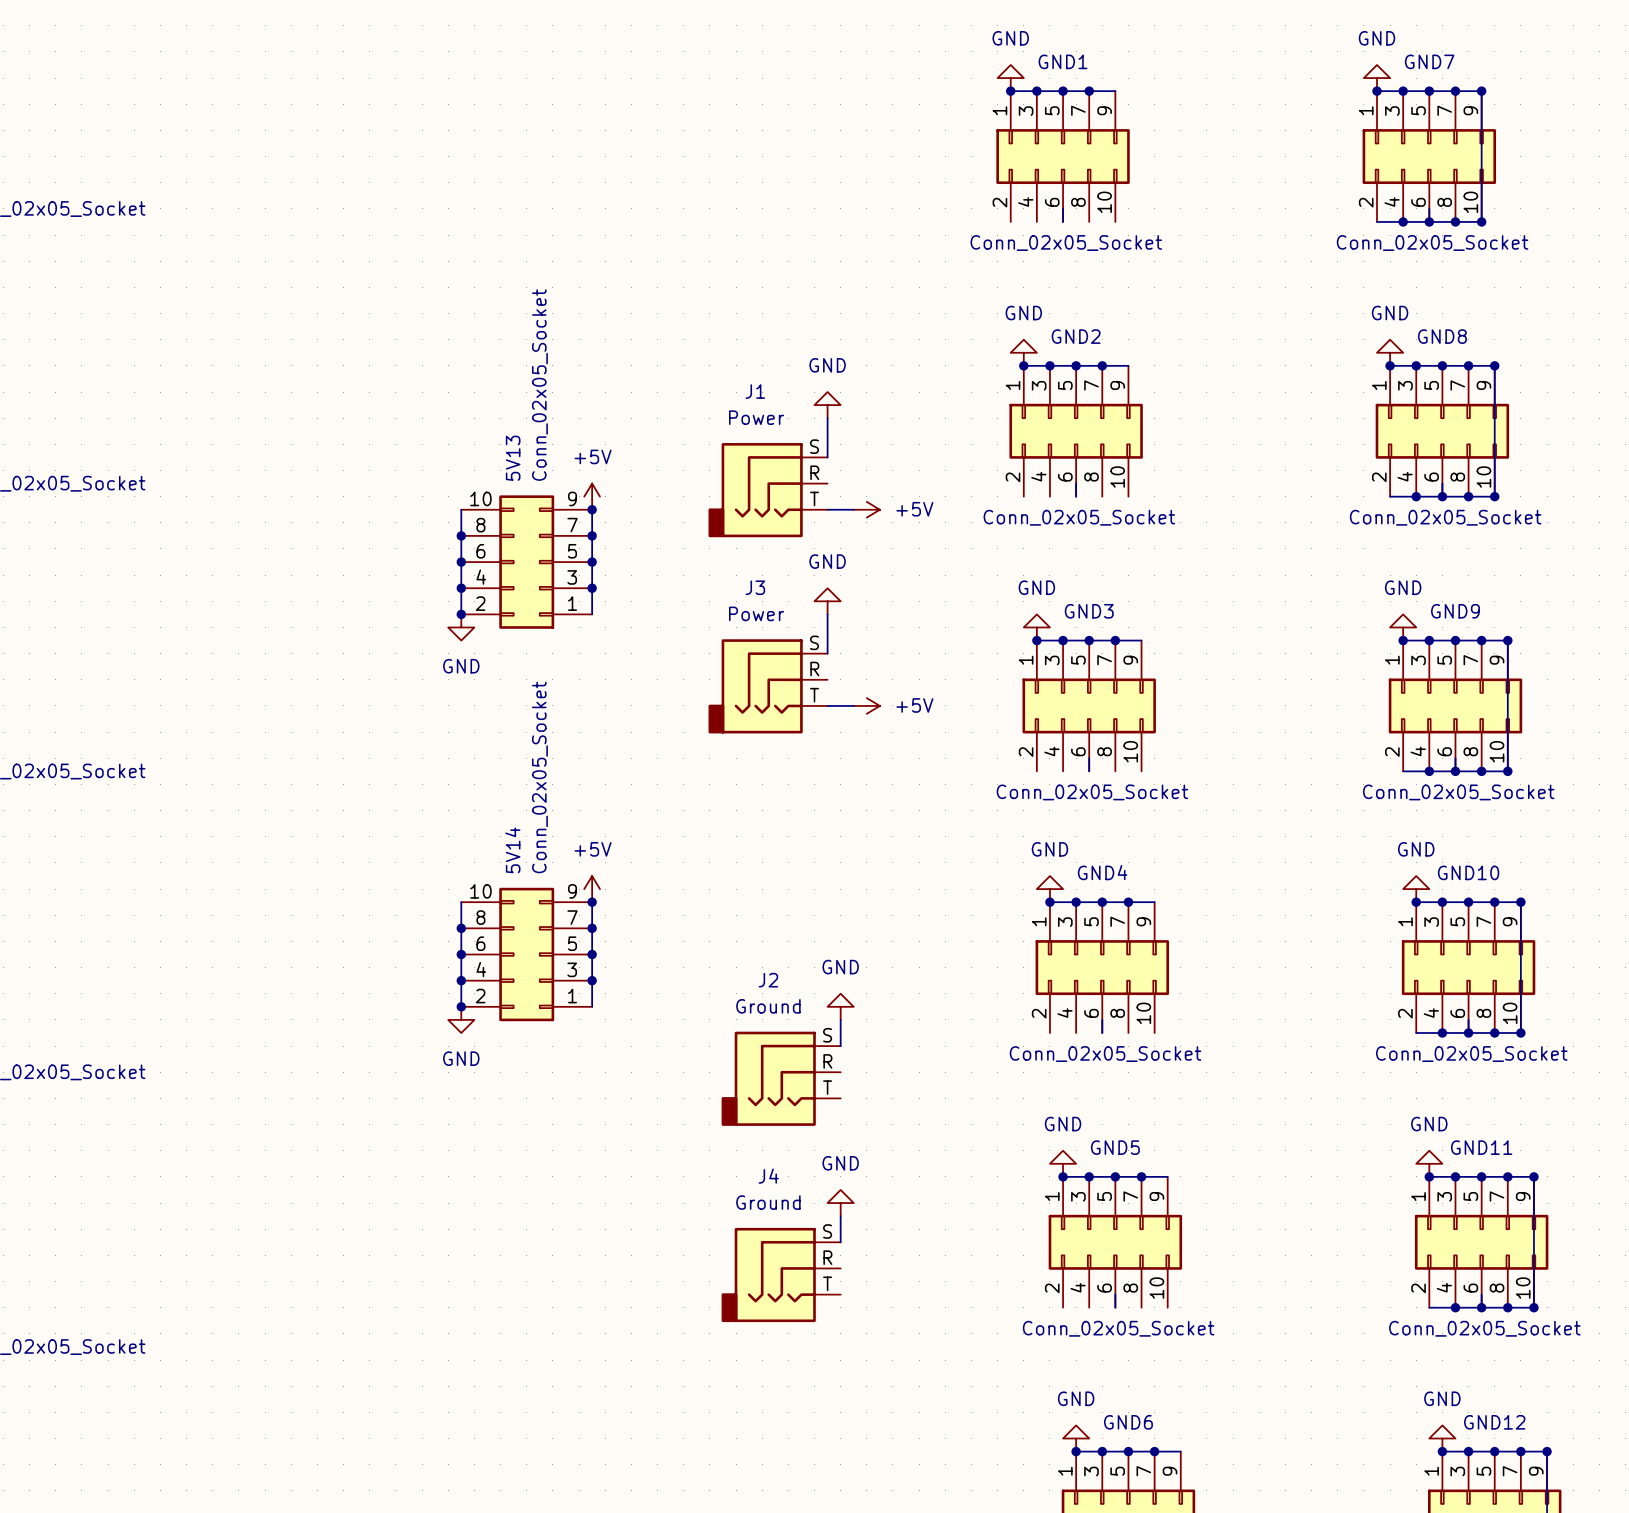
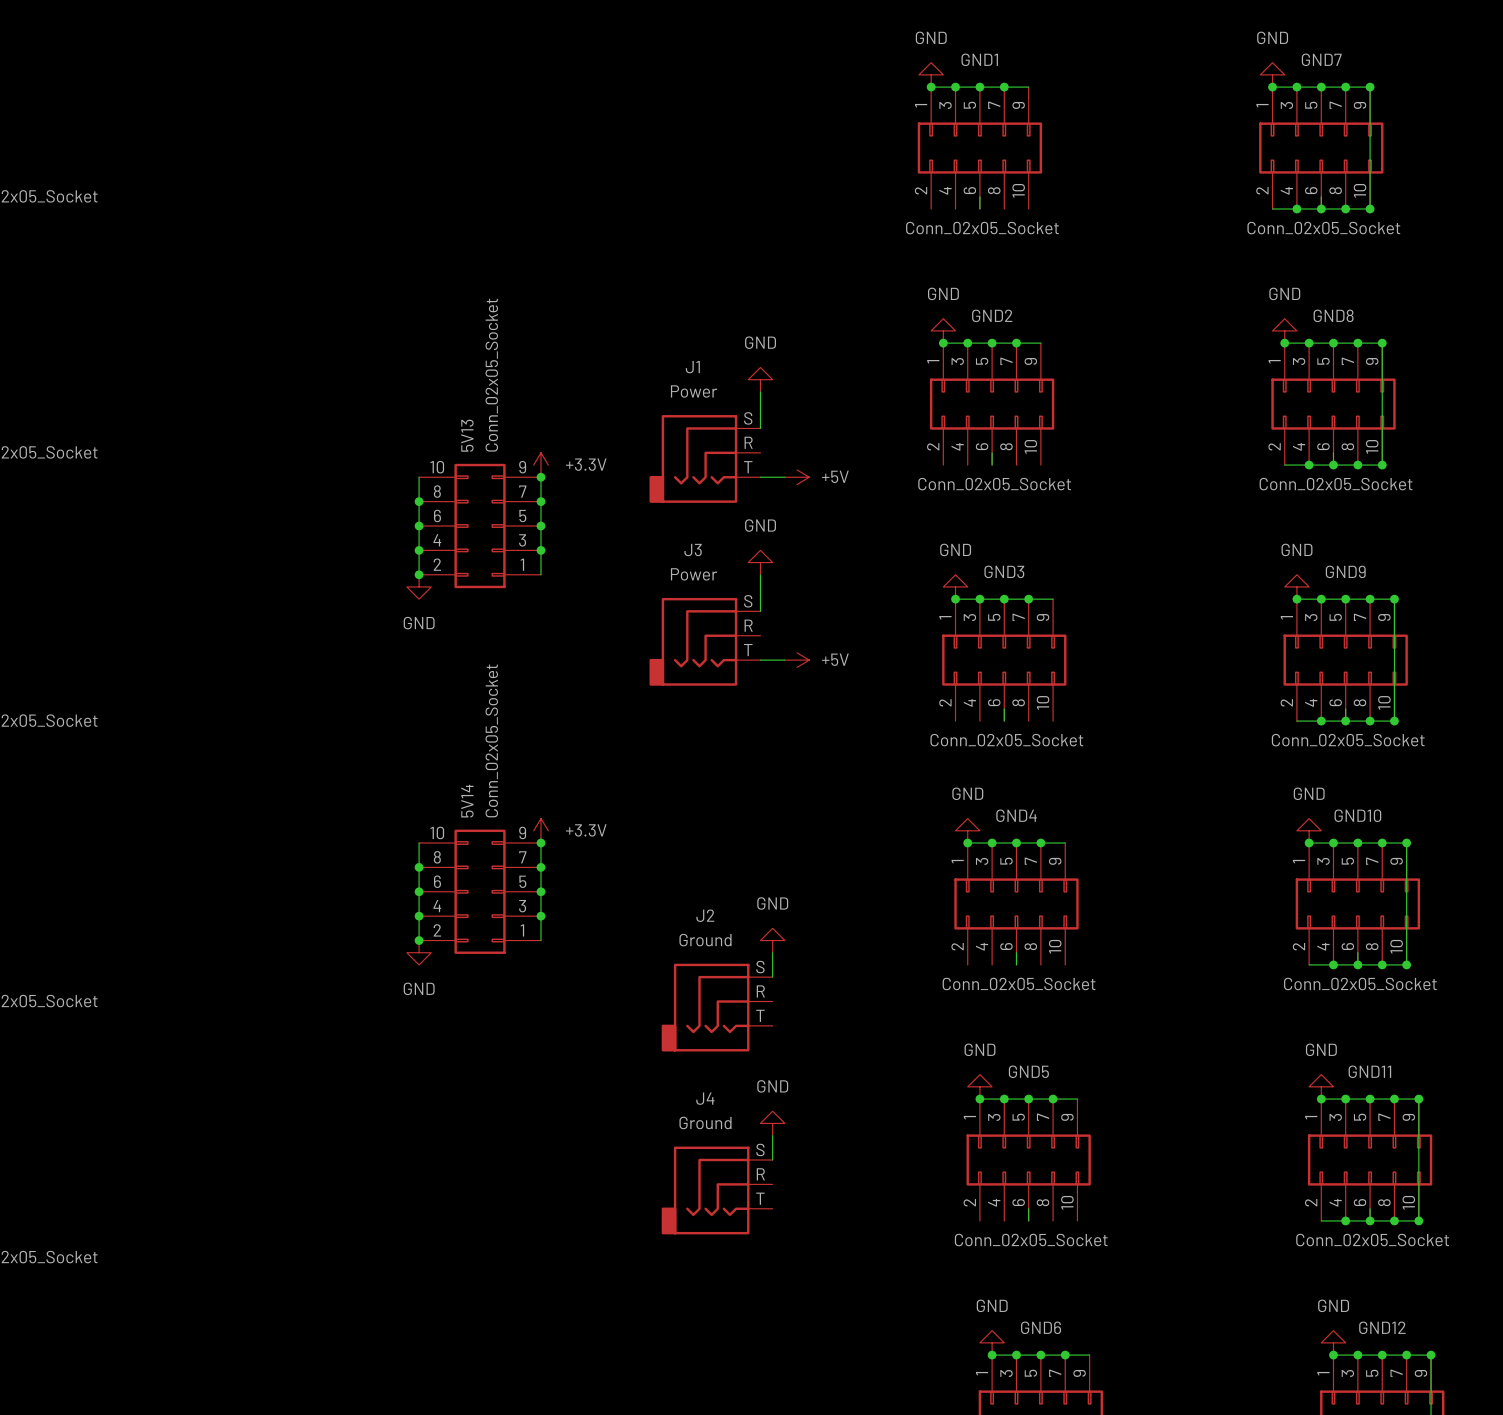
power symbol: +5V (592, 496) -> +3.3V (540, 465)
power symbol: +5V (592, 889) -> +3.3V (540, 830)

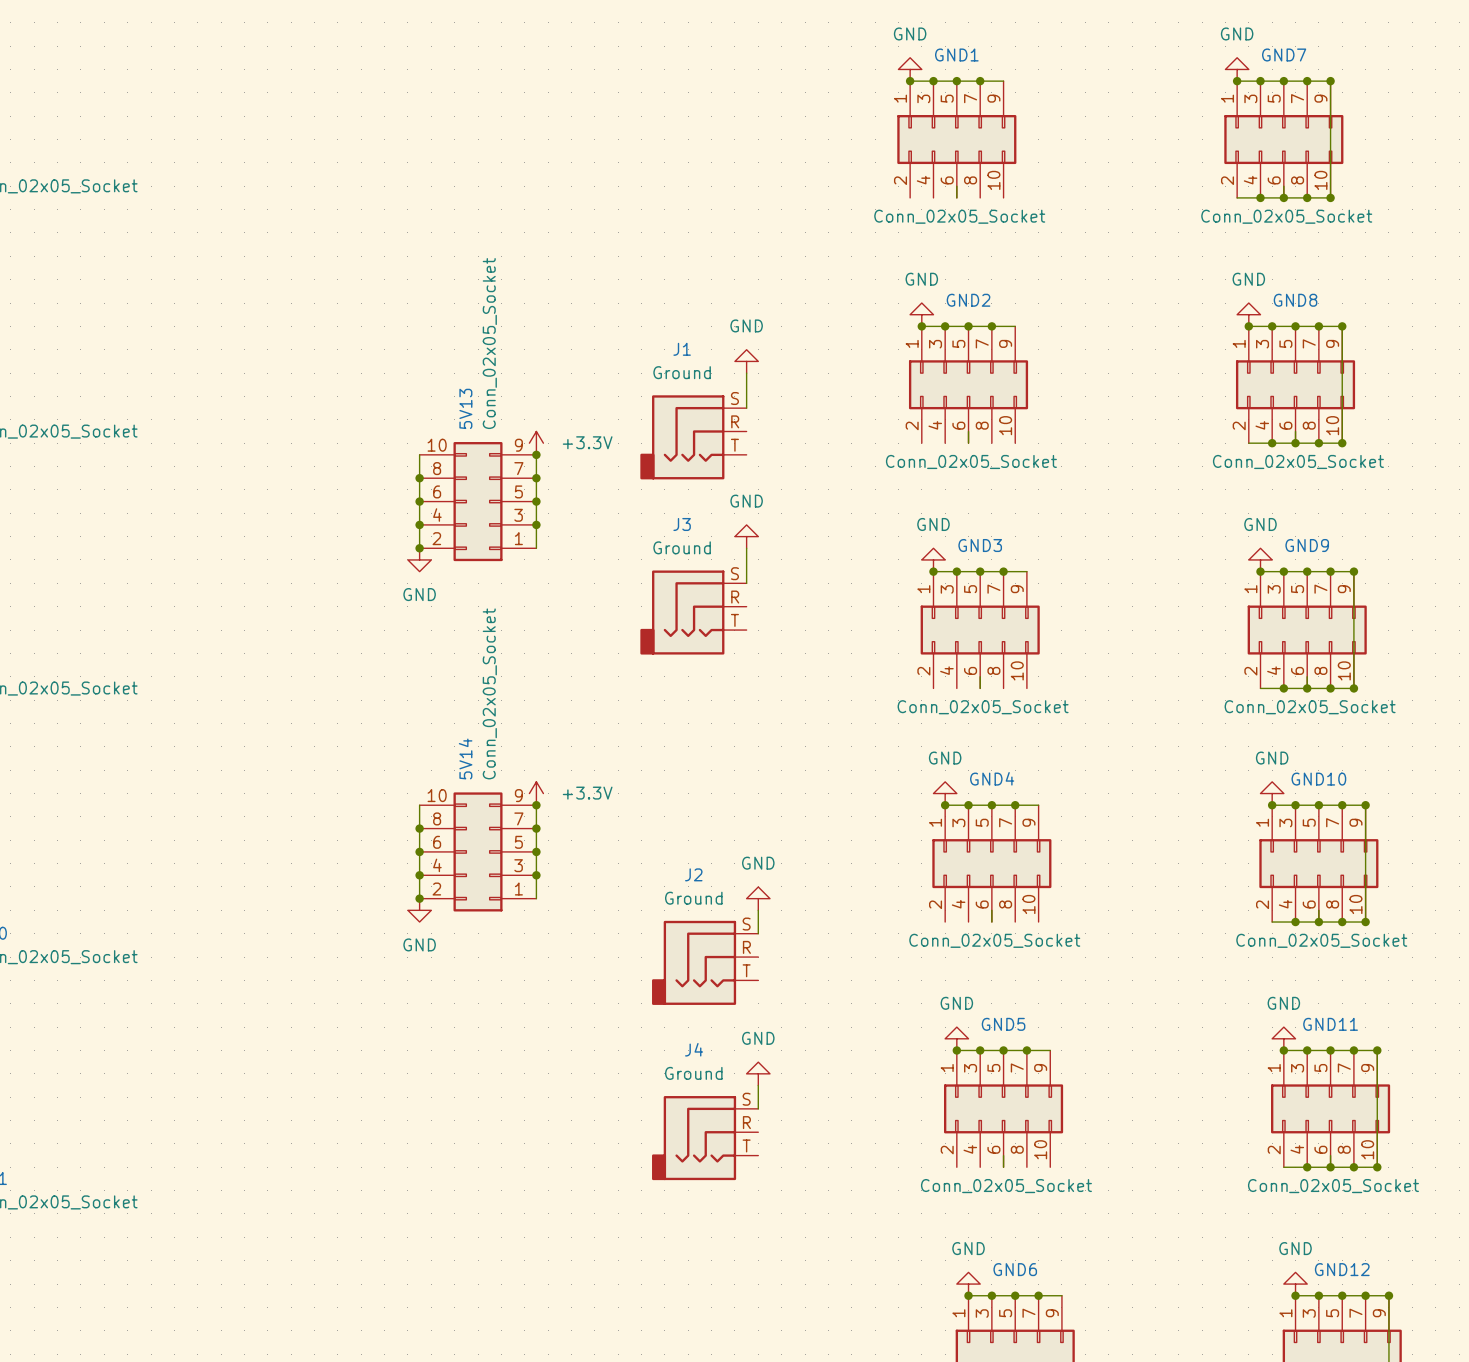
J1 value: Power (694, 391) -> Ground (682, 372)
wire: (760, 477) (784, 477) -> none
power symbol: +5V (797, 477) -> none
J3 value: Power (694, 574) -> Ground (682, 547)
wire: (760, 660) (784, 660) -> none
power symbol: +5V (797, 660) -> none

